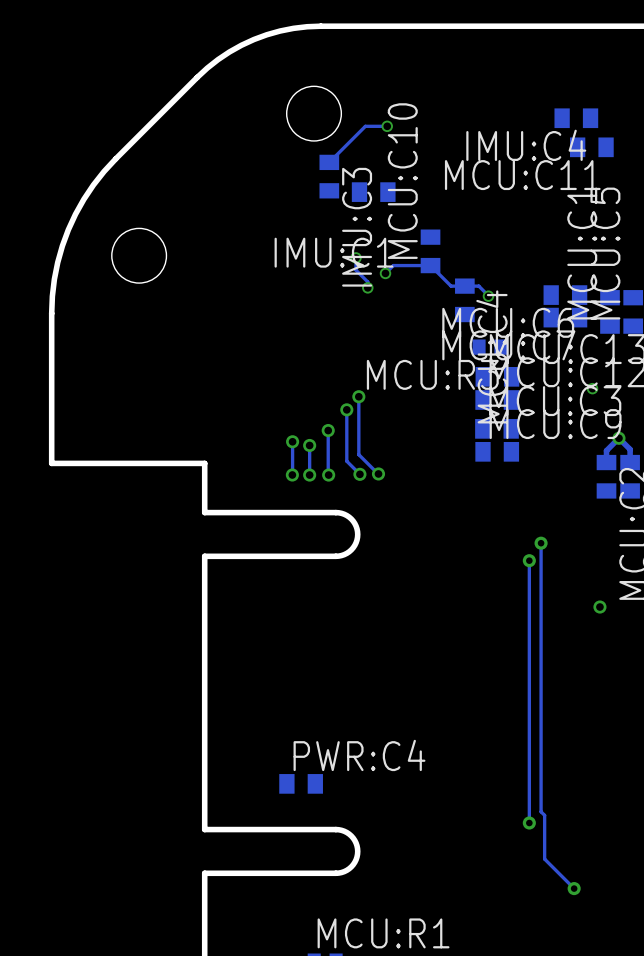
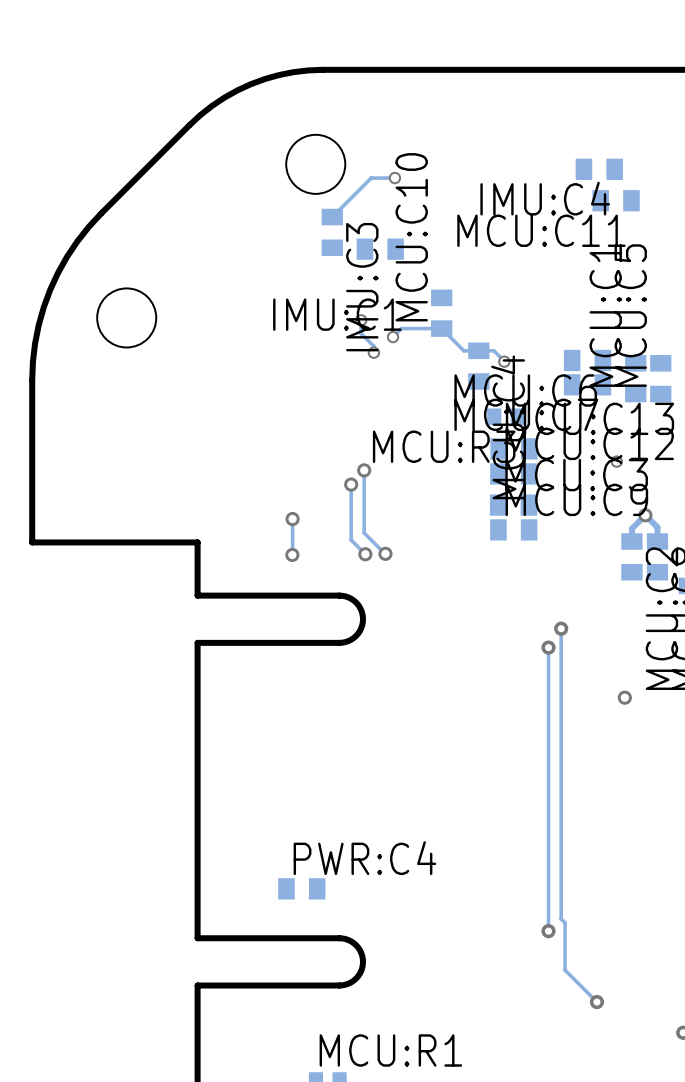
track: (328, 430) (328, 475) -> none
via: (328, 430) -> none
track: (309, 445) (309, 475) -> none
via: (309, 445) -> none
via: (309, 475) -> none
via: (328, 475) -> none

